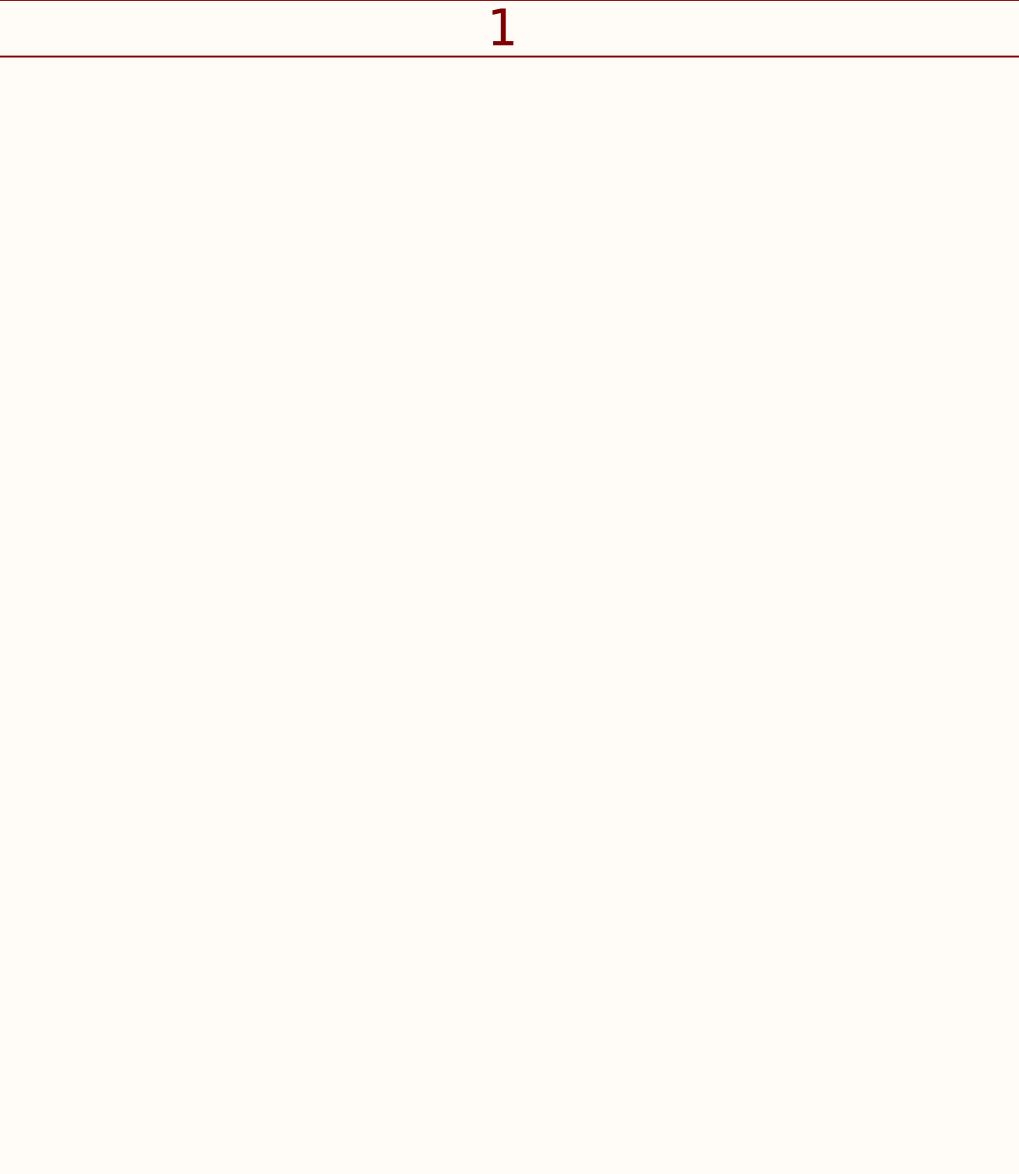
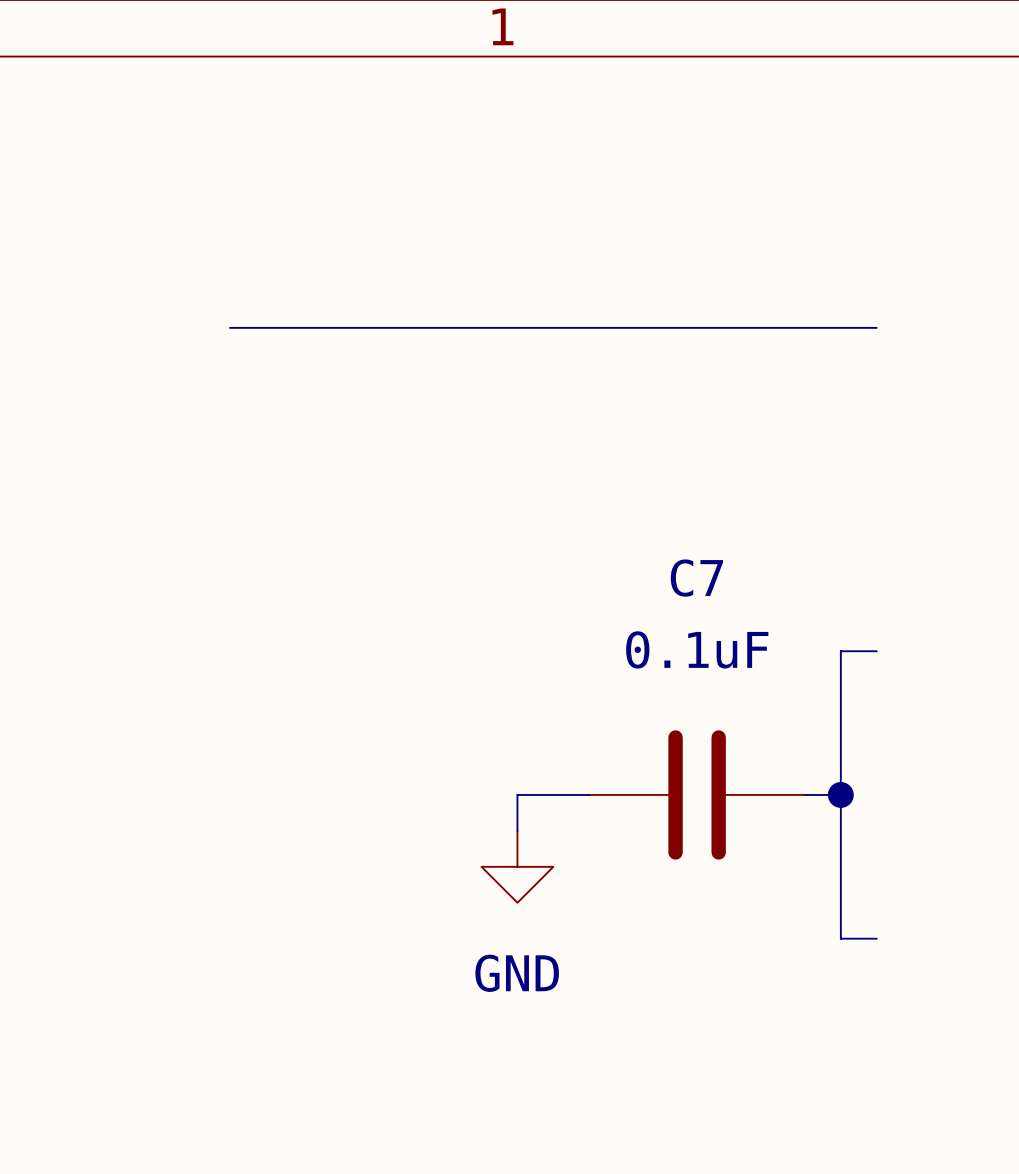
wire: none -> (230, 327) (876, 327)
wire: none -> (876, 651) (840, 651) (840, 938) (876, 938)
wire: none -> (589, 794) (517, 794) (517, 830)
C7: none -> 0.1uF (697, 794)
wire: none -> (804, 794) (840, 794)
junction: none -> (840, 794)
power symbol: none -> GND (517, 866)

